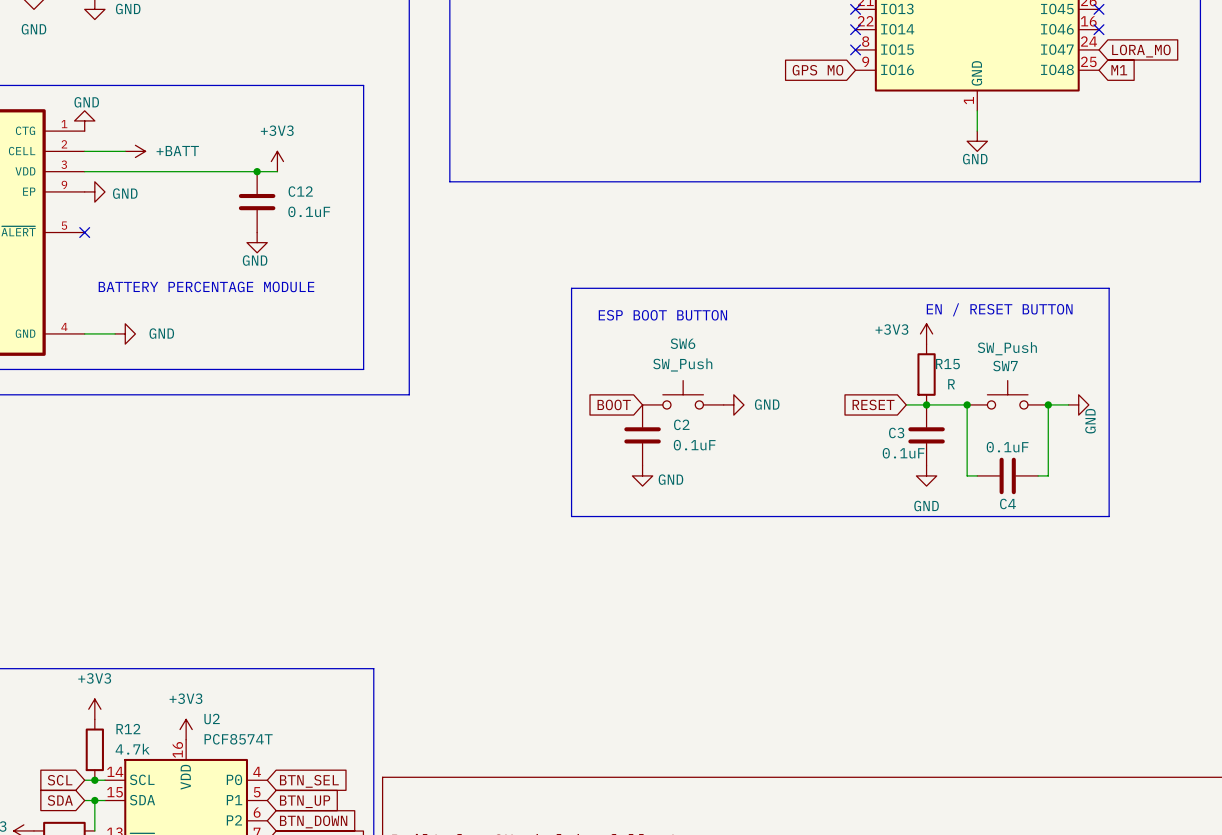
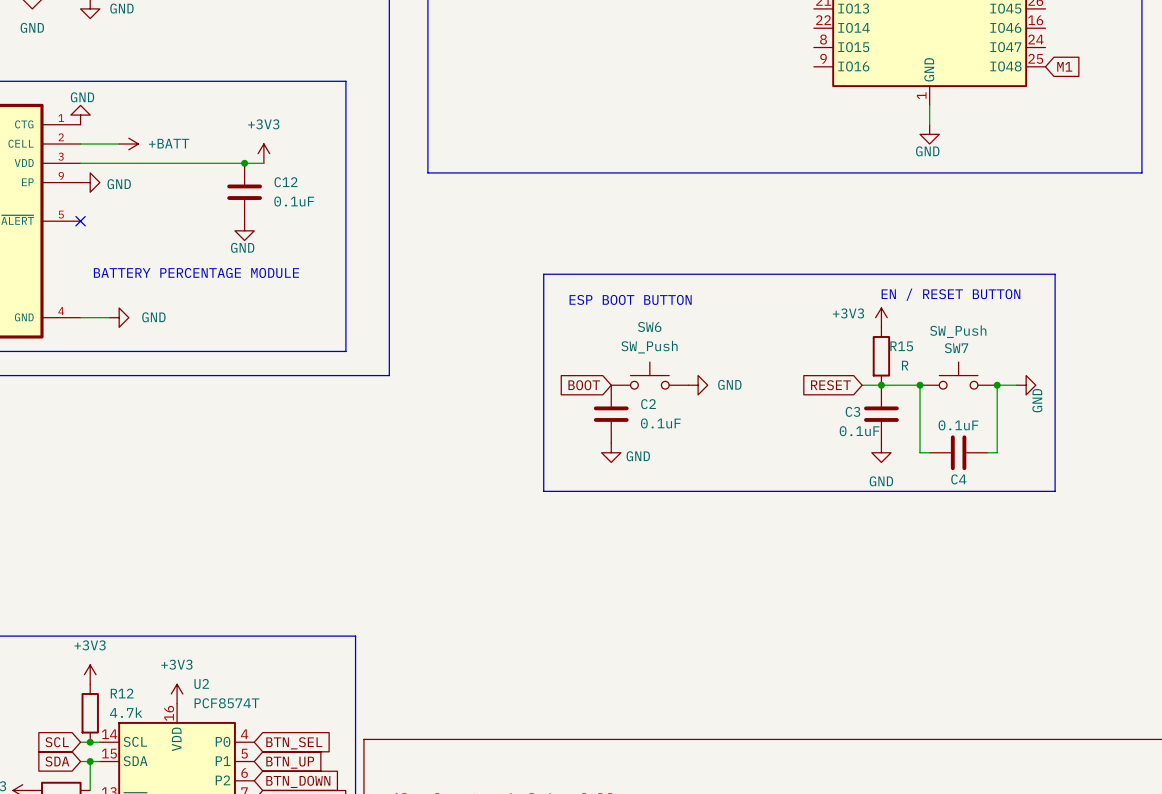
no-connect mark: (855, 9) -> none
no-connect mark: (1098, 9) -> none
no-connect mark: (855, 29) -> none
no-connect mark: (1098, 29) -> none
no-connect mark: (855, 49) -> none
global label: LORA_MO (1141, 51) -> none
global label: GPS MO (817, 70) -> none

